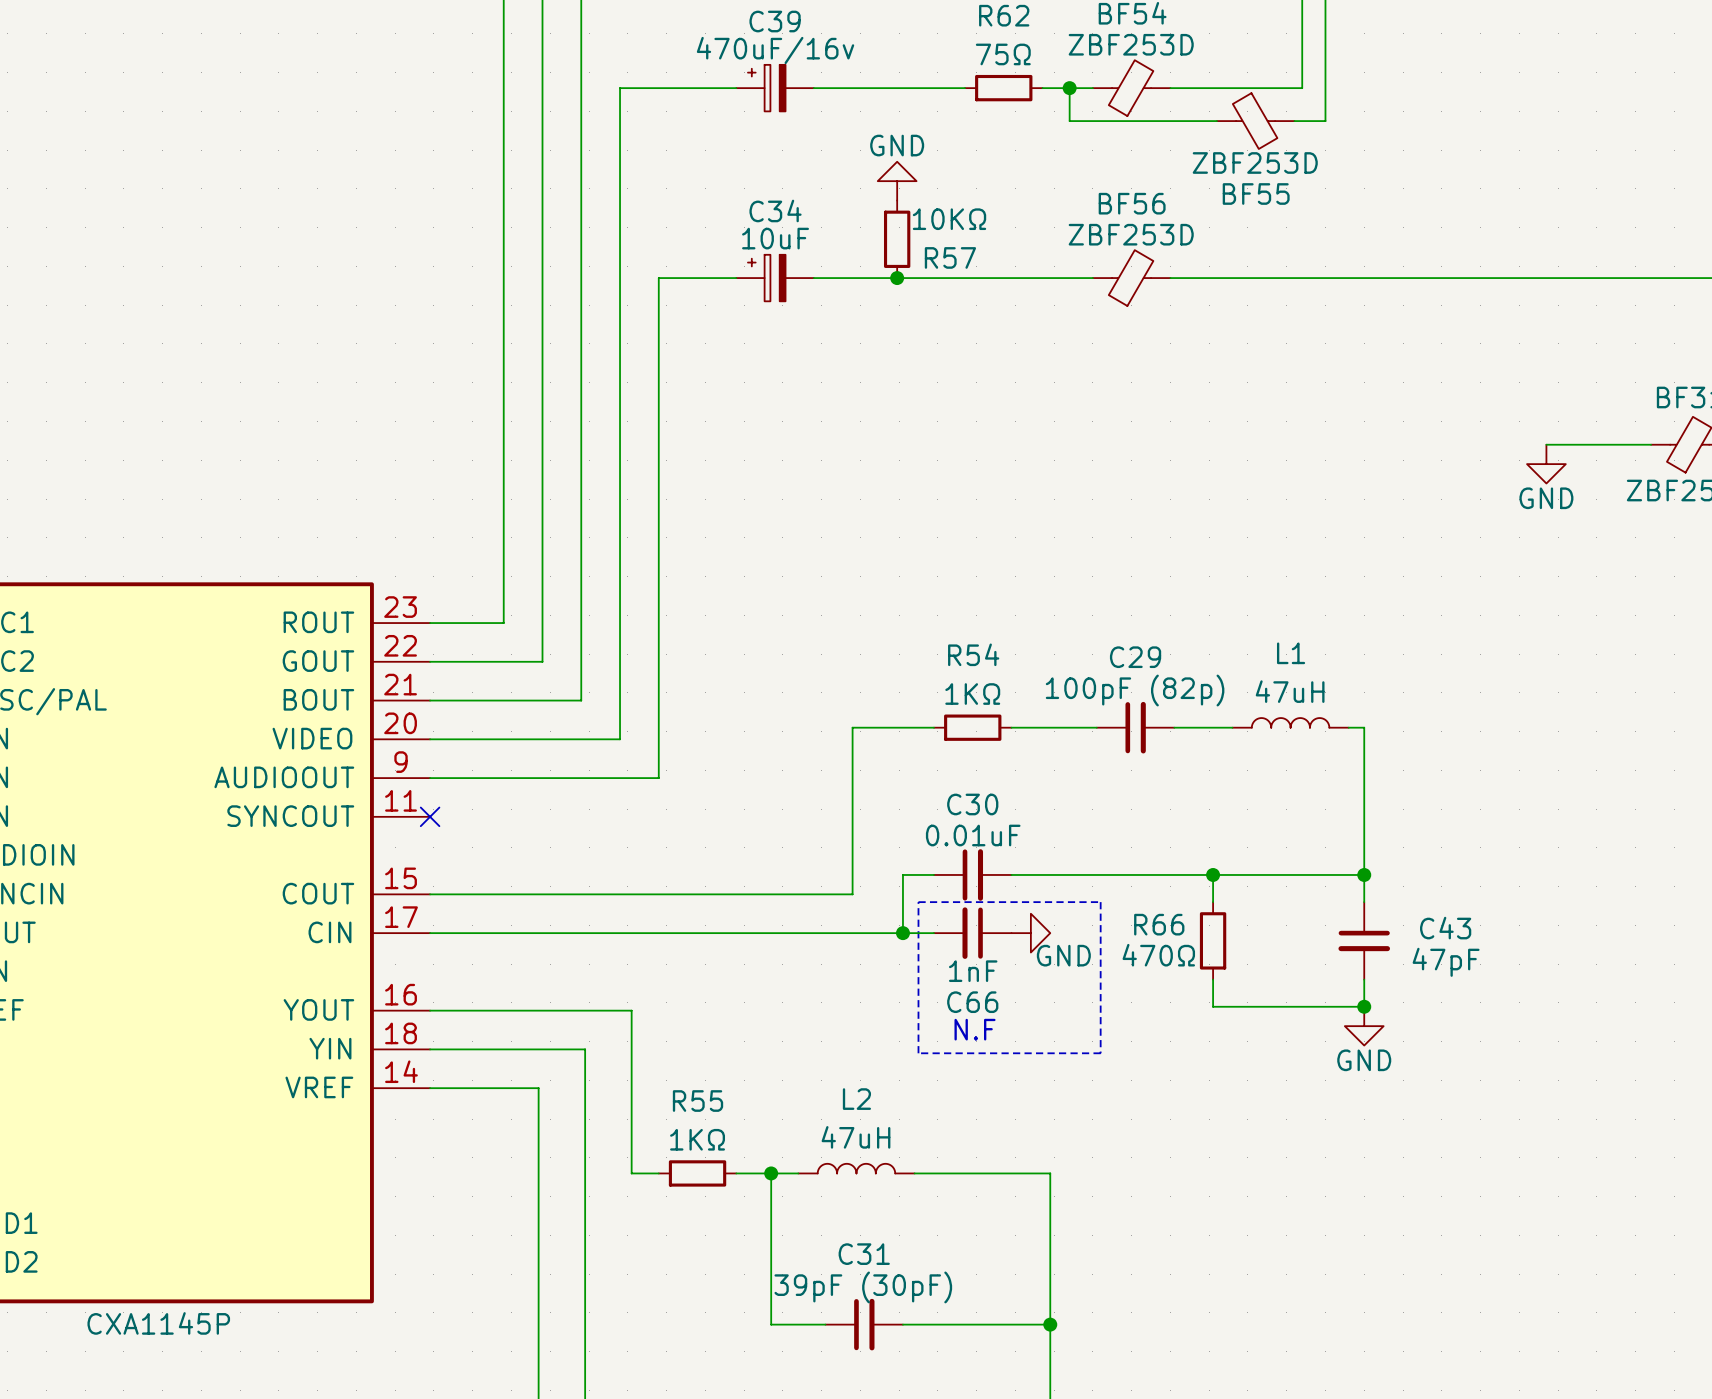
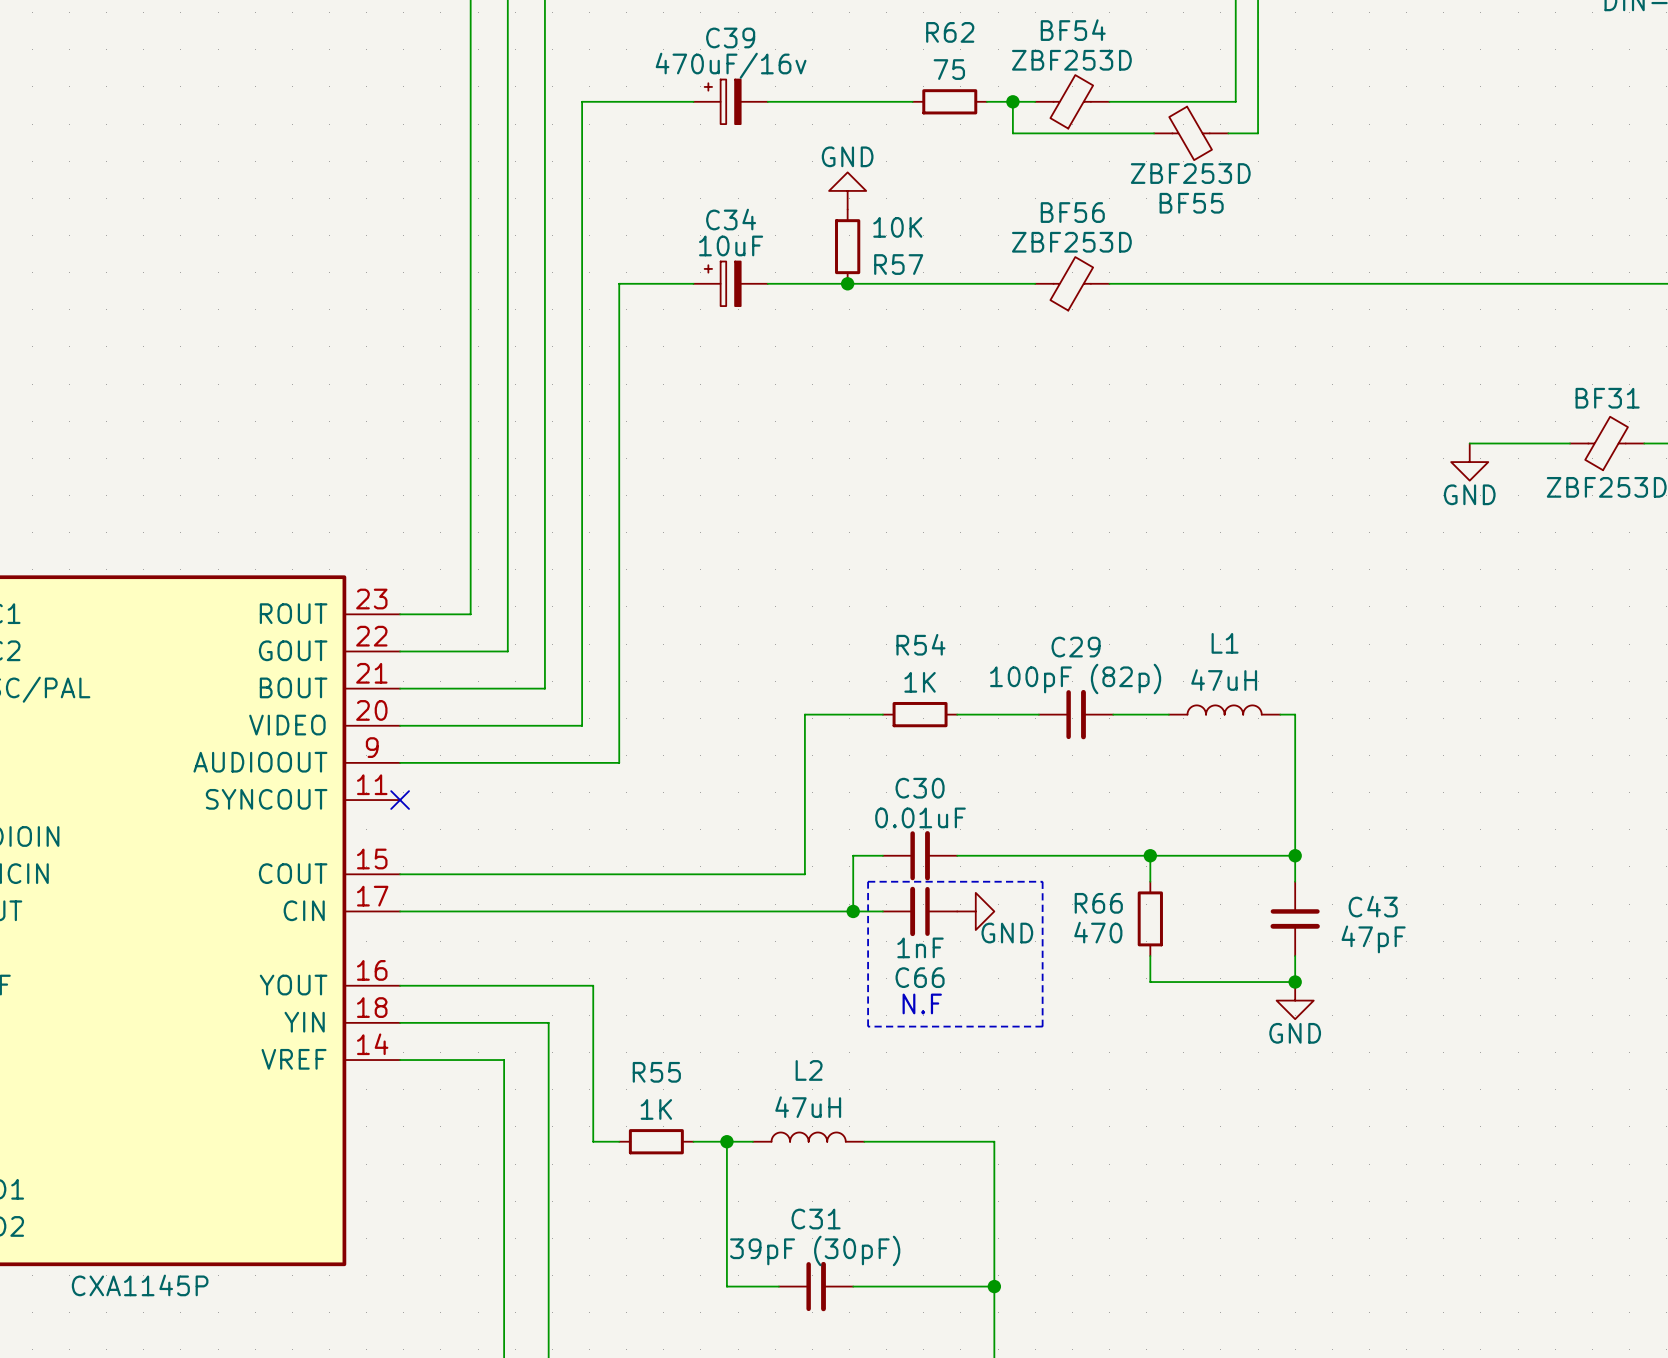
R62 value: 75Ω (1003, 54) -> 75 (949, 69)
R57 value: 10KΩ (949, 219) -> 10K (897, 227)
R54 value: 1KΩ (972, 694) -> 1K (920, 682)
R66 value: 470Ω (1158, 955) -> 470 (1098, 932)
R55 value: 1KΩ (697, 1139) -> 1K (656, 1109)

